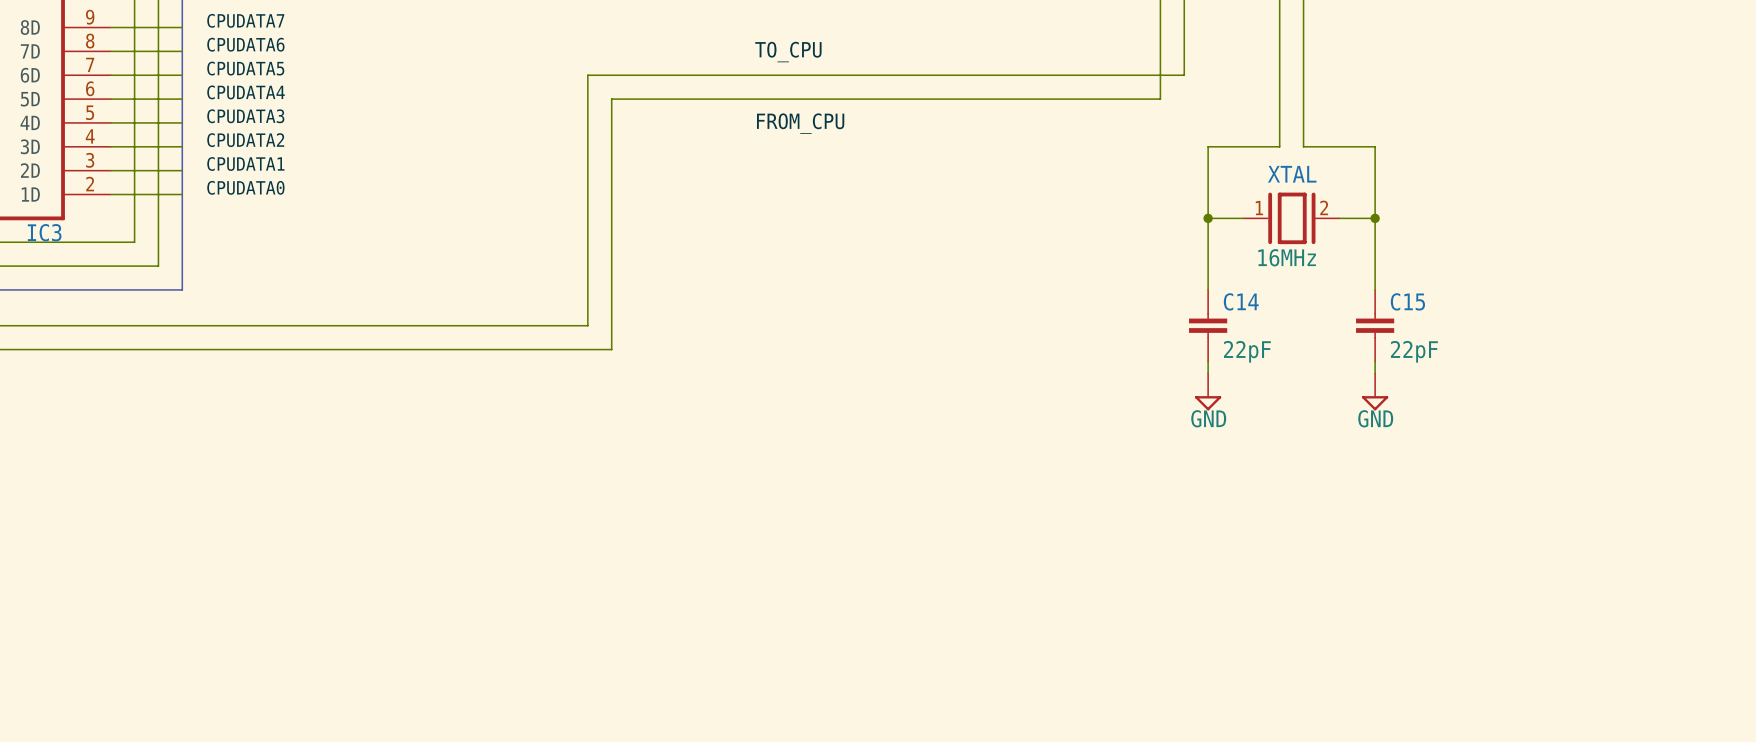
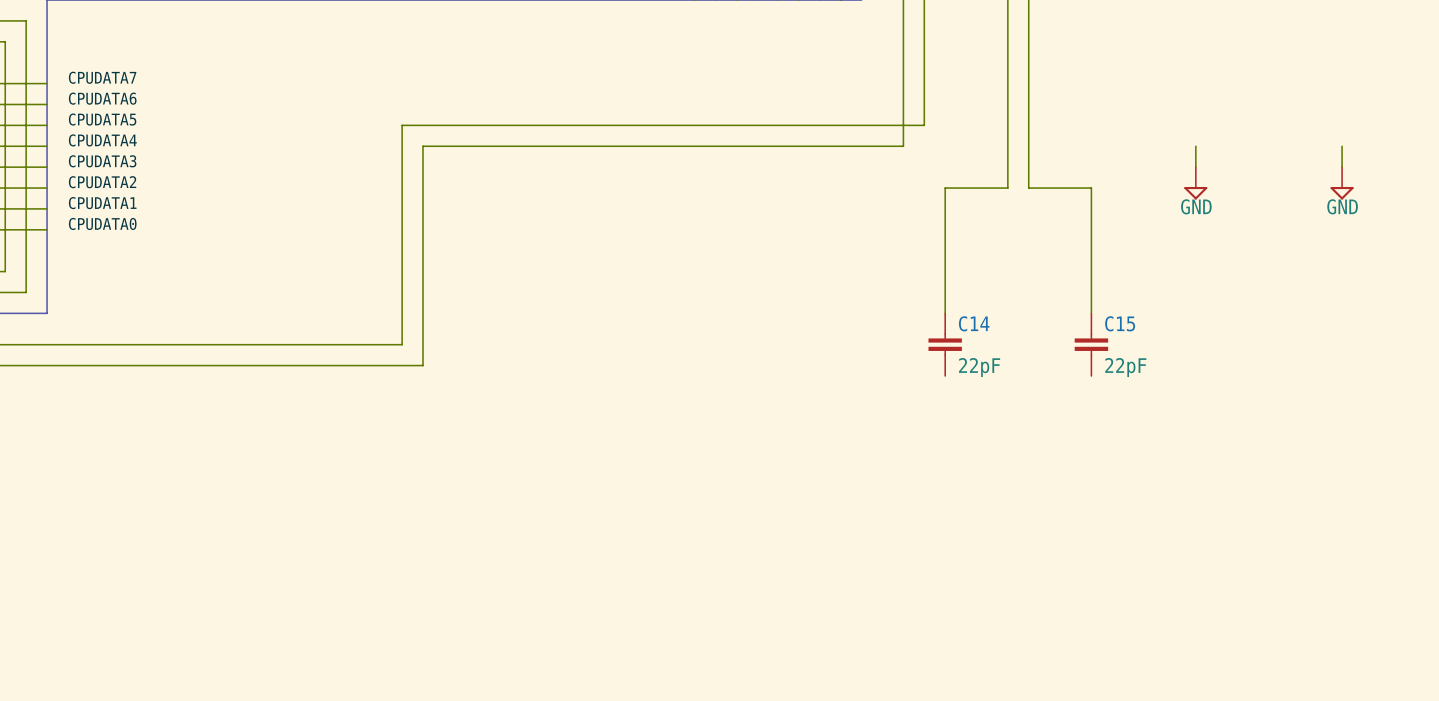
label: TO_CPU (788, 52) -> none
wire: none -> (1195, 146) (1195, 167)
wire: none -> (1342, 146) (1342, 167)
label: FROM_CPU (800, 123) -> none
power symbol: none -> GND (1195, 183)
power symbol: none -> GND (1342, 183)
wire: (1208, 218) (1243, 218) -> none
junction: (1208, 218) -> none
XTAL: 16MHz (1291, 218) -> none
wire: (1339, 218) (1375, 218) -> none
junction: (1375, 218) -> none
wire: (1208, 361) (1208, 373) -> none
wire: (1375, 361) (1375, 373) -> none
power symbol: GND (1208, 391) -> none
power symbol: GND (1375, 391) -> none

